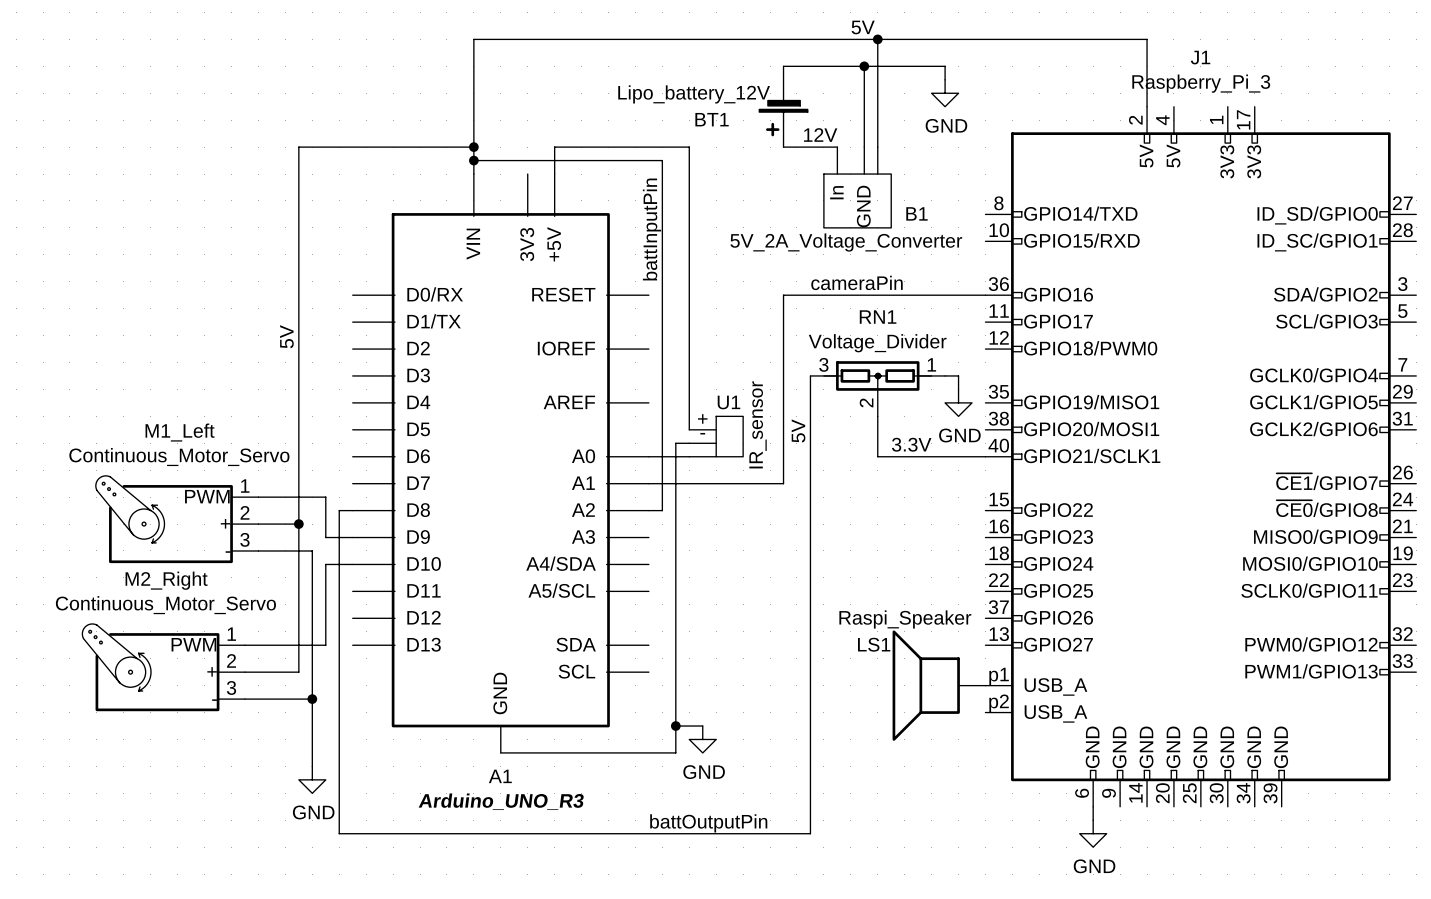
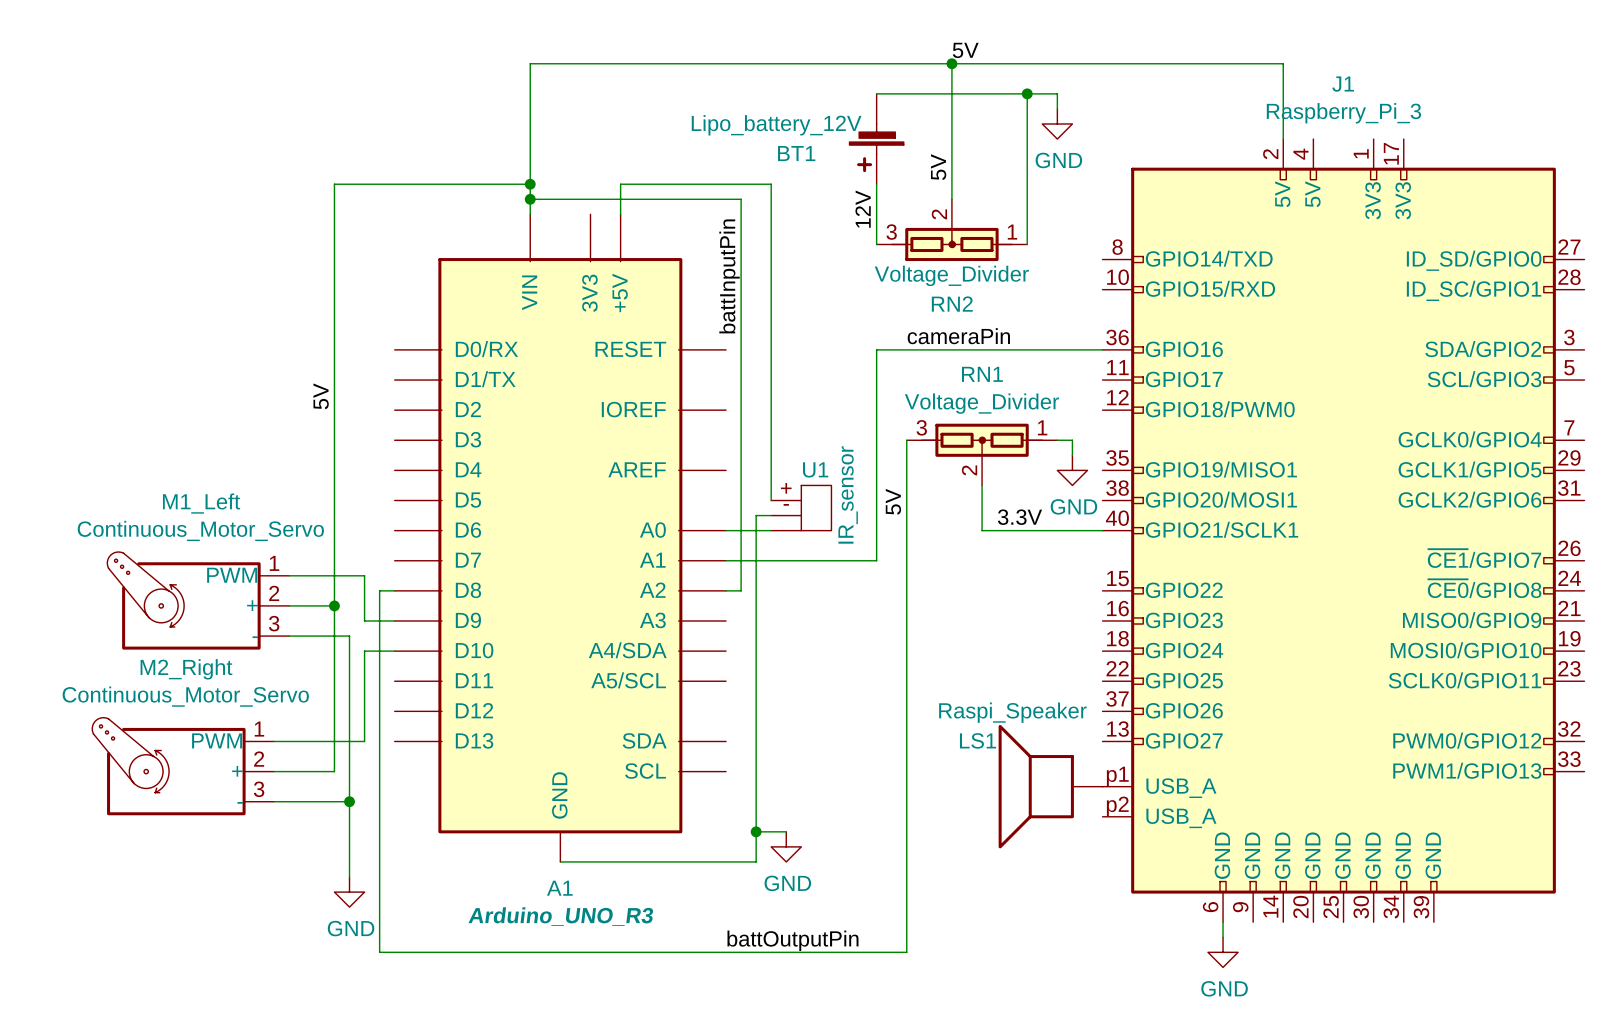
wire: none -> (951, 63) (951, 199)
junction: none -> (951, 63)
wire: (877, 39) (877, 147) -> none
junction: (877, 39) -> none
wire: (864, 66) (864, 147) -> none
junction: (864, 66) -> none
wire: none -> (1027, 93) (1027, 244)
junction: none -> (1027, 93)
label: none -> 5V (938, 167)
label rotation: 0° (820, 134) -> 90° counterclockwise (863, 209)
label position: 12V (820, 134) -> 12V (863, 209)
wire: (783, 147) (837, 147) -> (876, 184) (876, 244)
B1: 5V_2A_Voltage_Converter (857, 187) -> none
RN2: none -> Voltage_Divider (951, 230)

